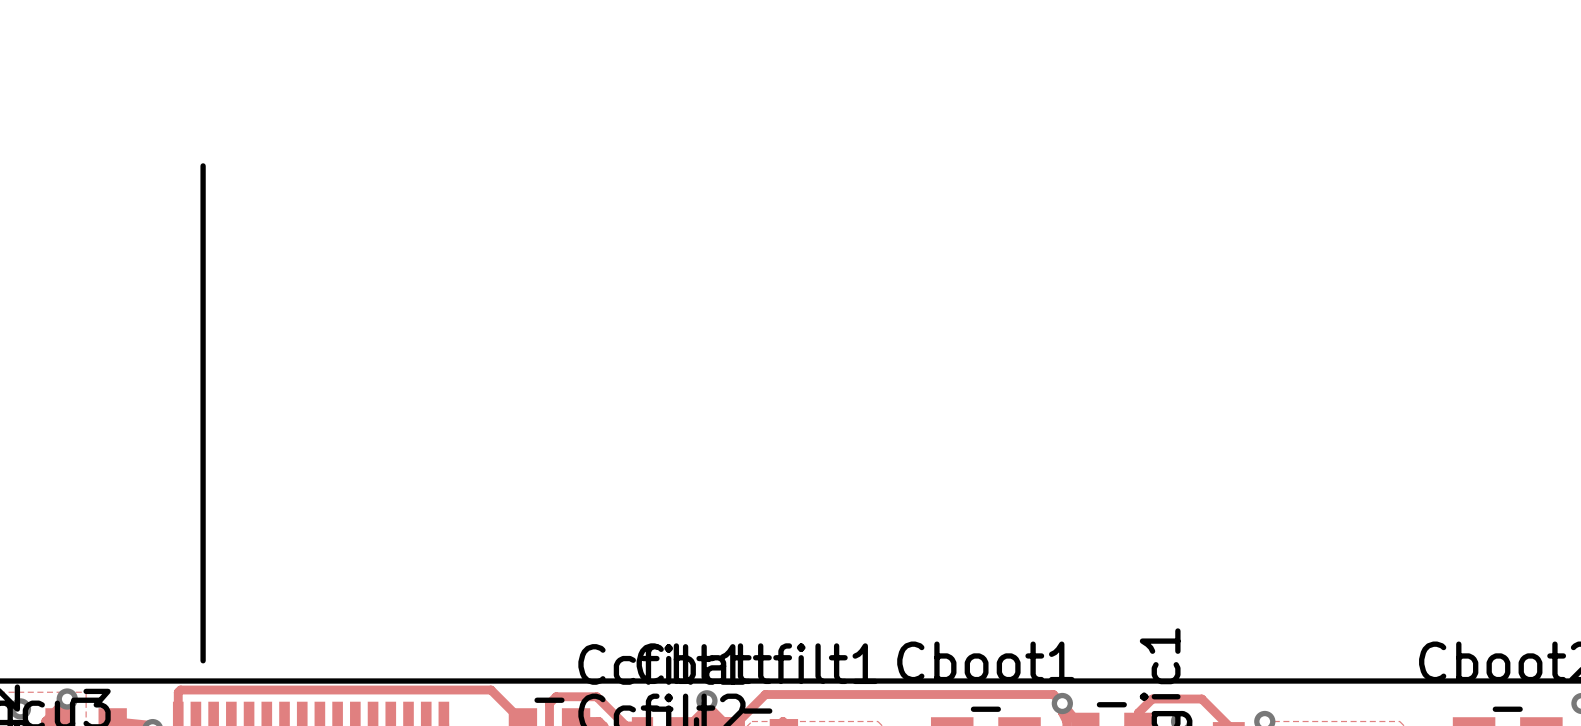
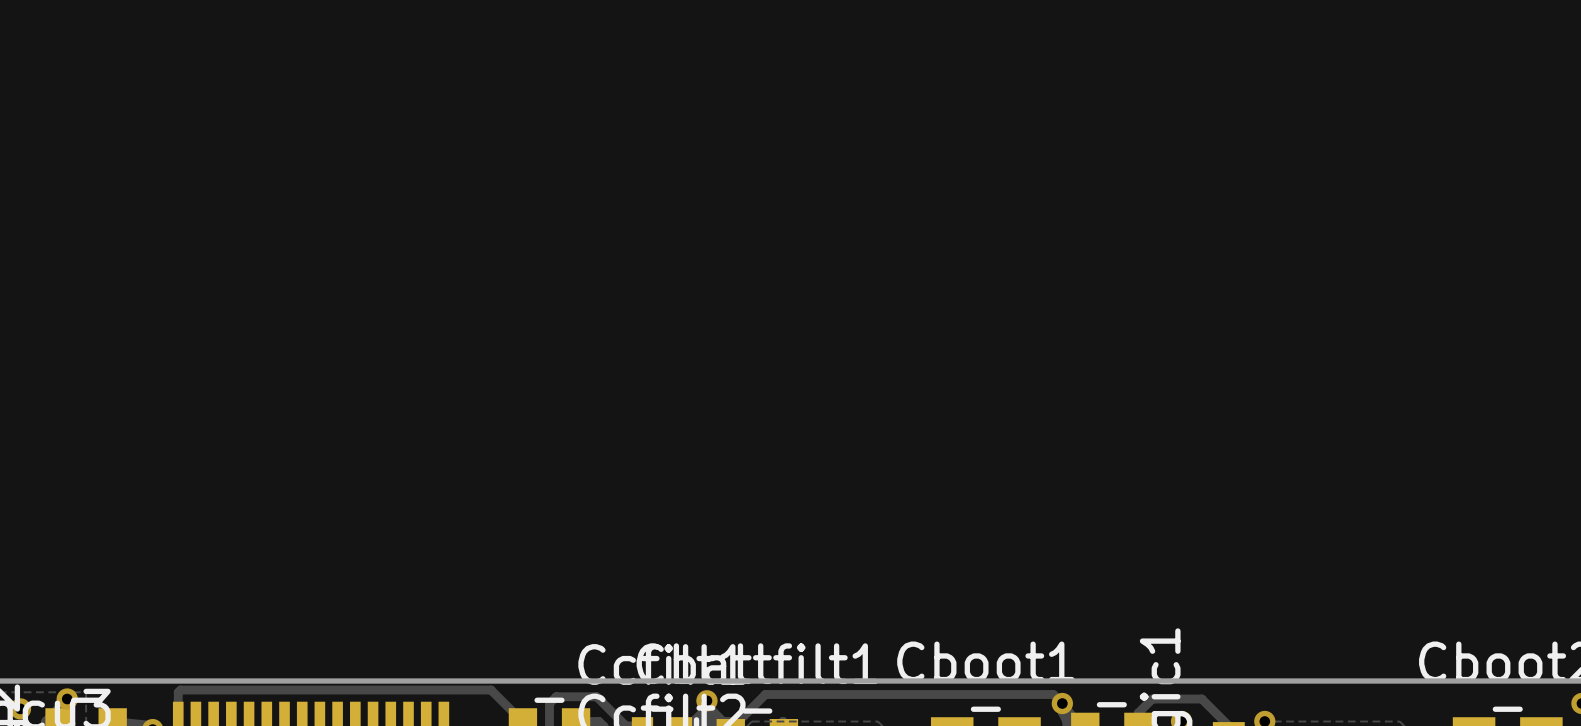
board edge: (203, 165) (203, 660) -> none

